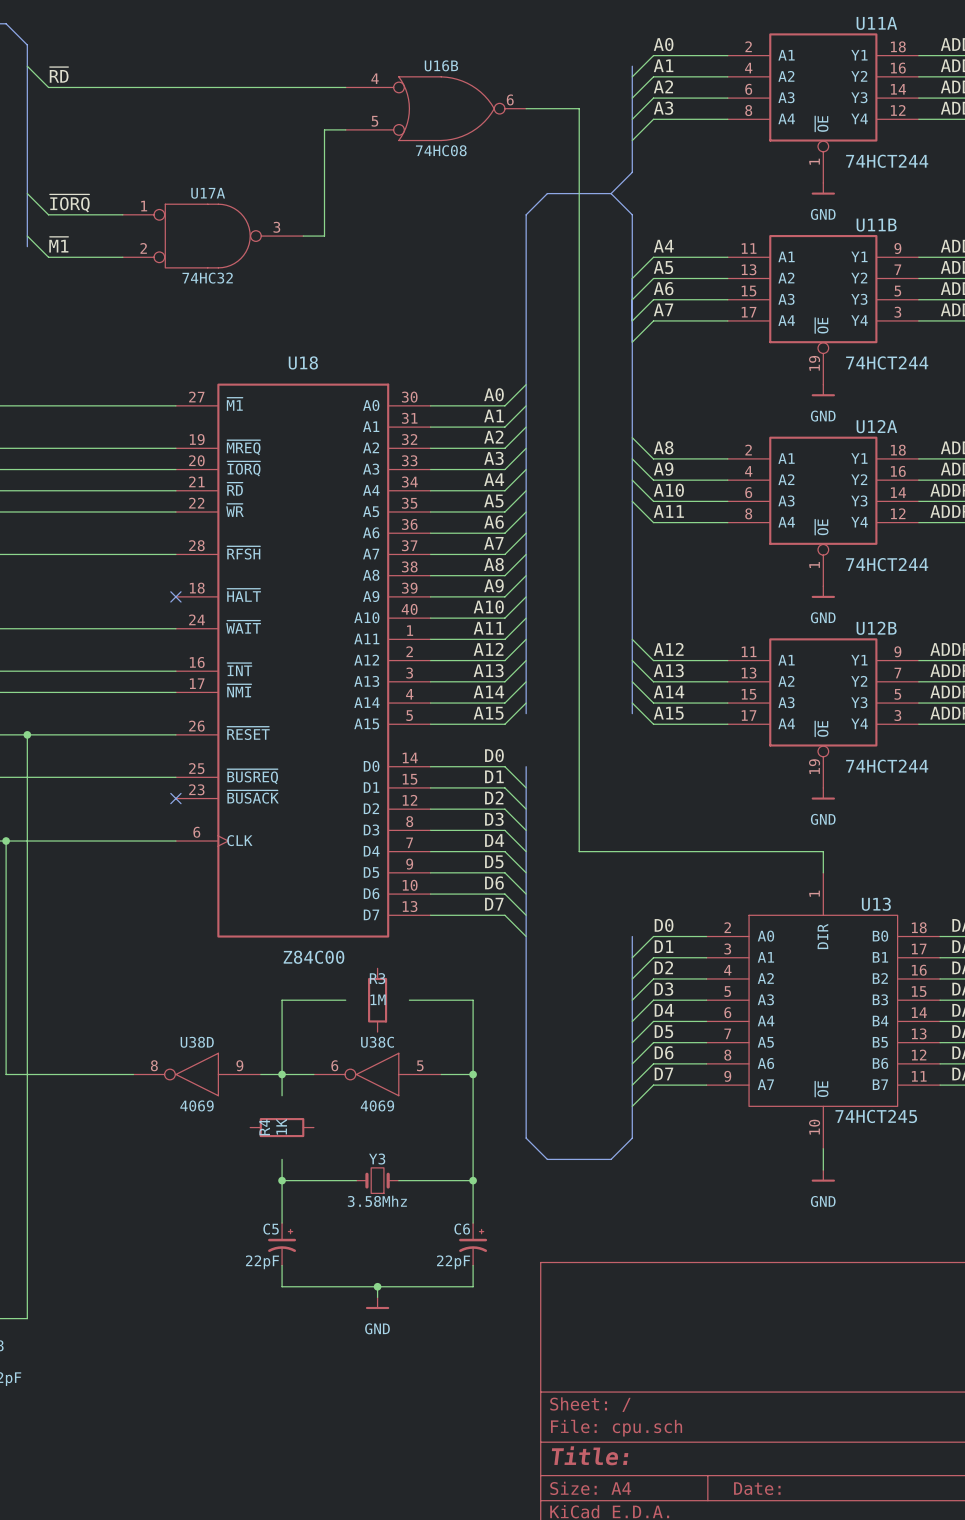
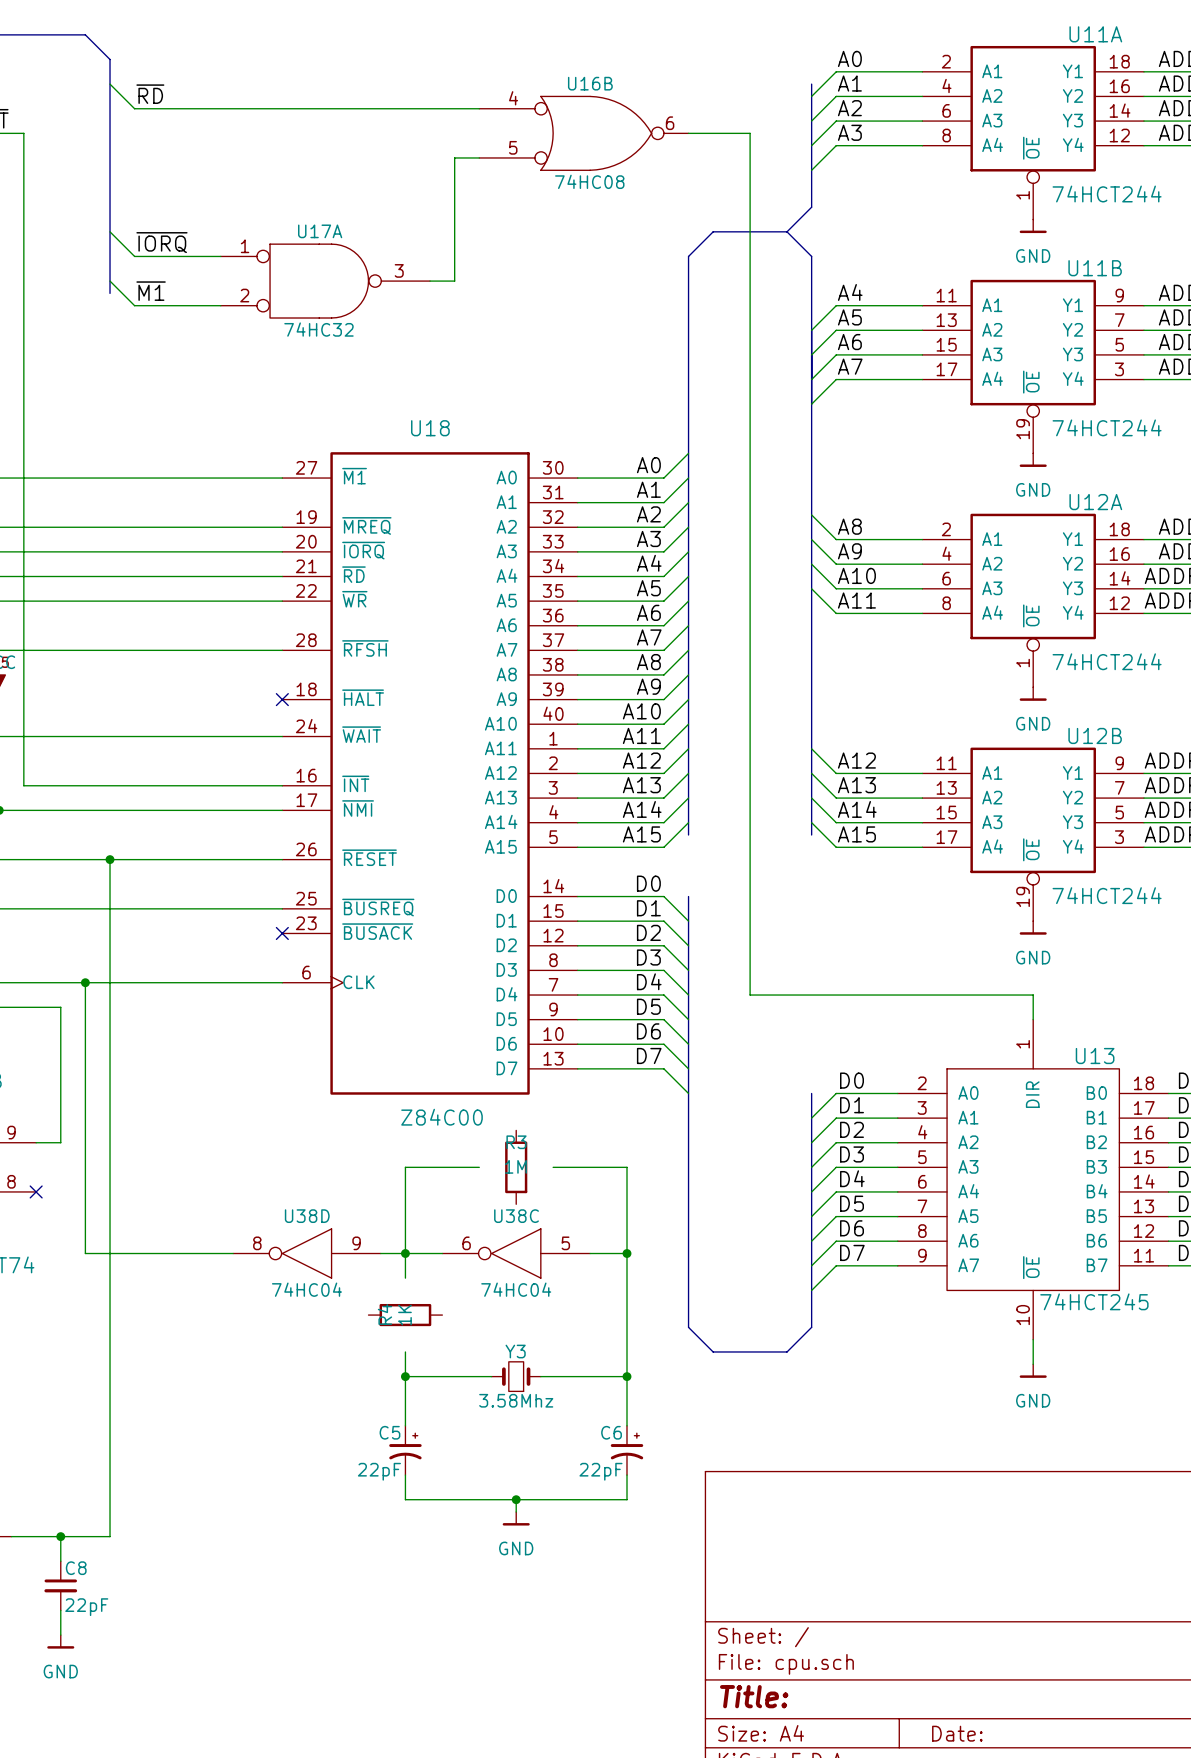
U38D value: 4069 (197, 1105) -> 74HC04 (306, 1289)
U38C value: 4069 (377, 1105) -> 74HC04 (516, 1289)

